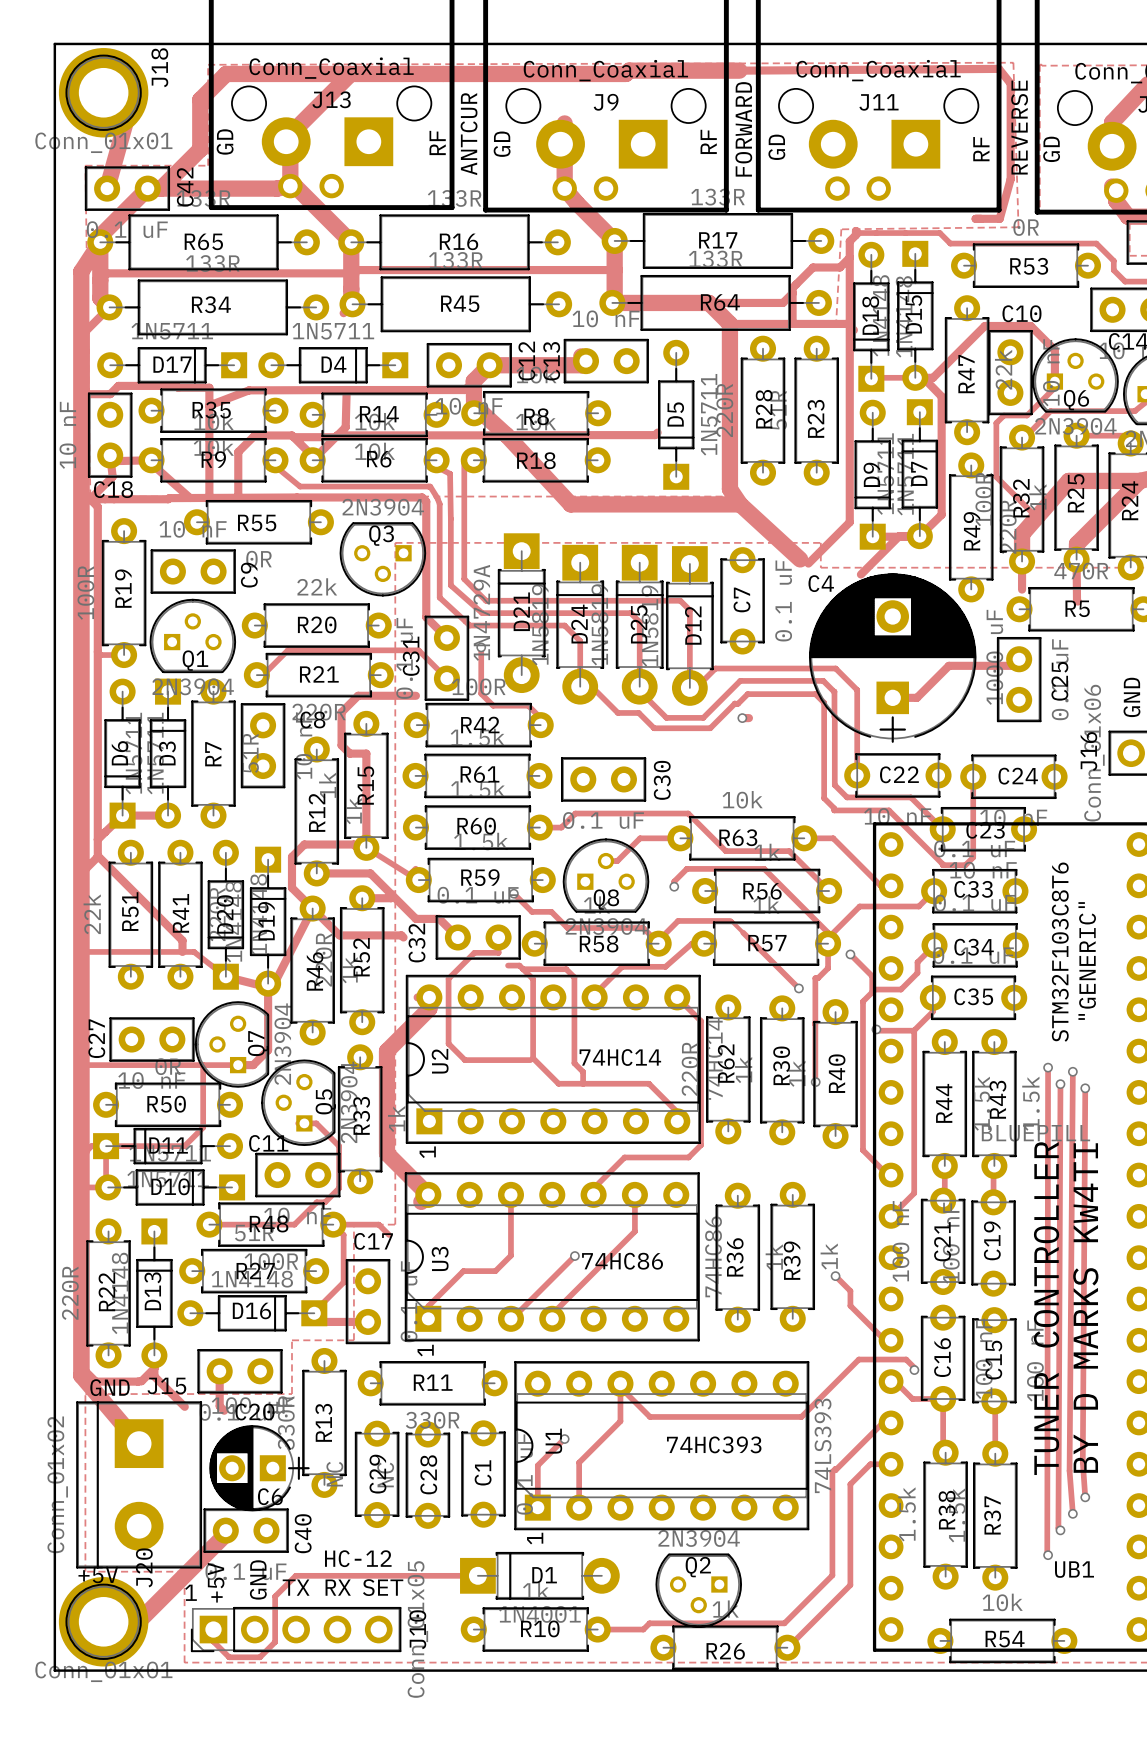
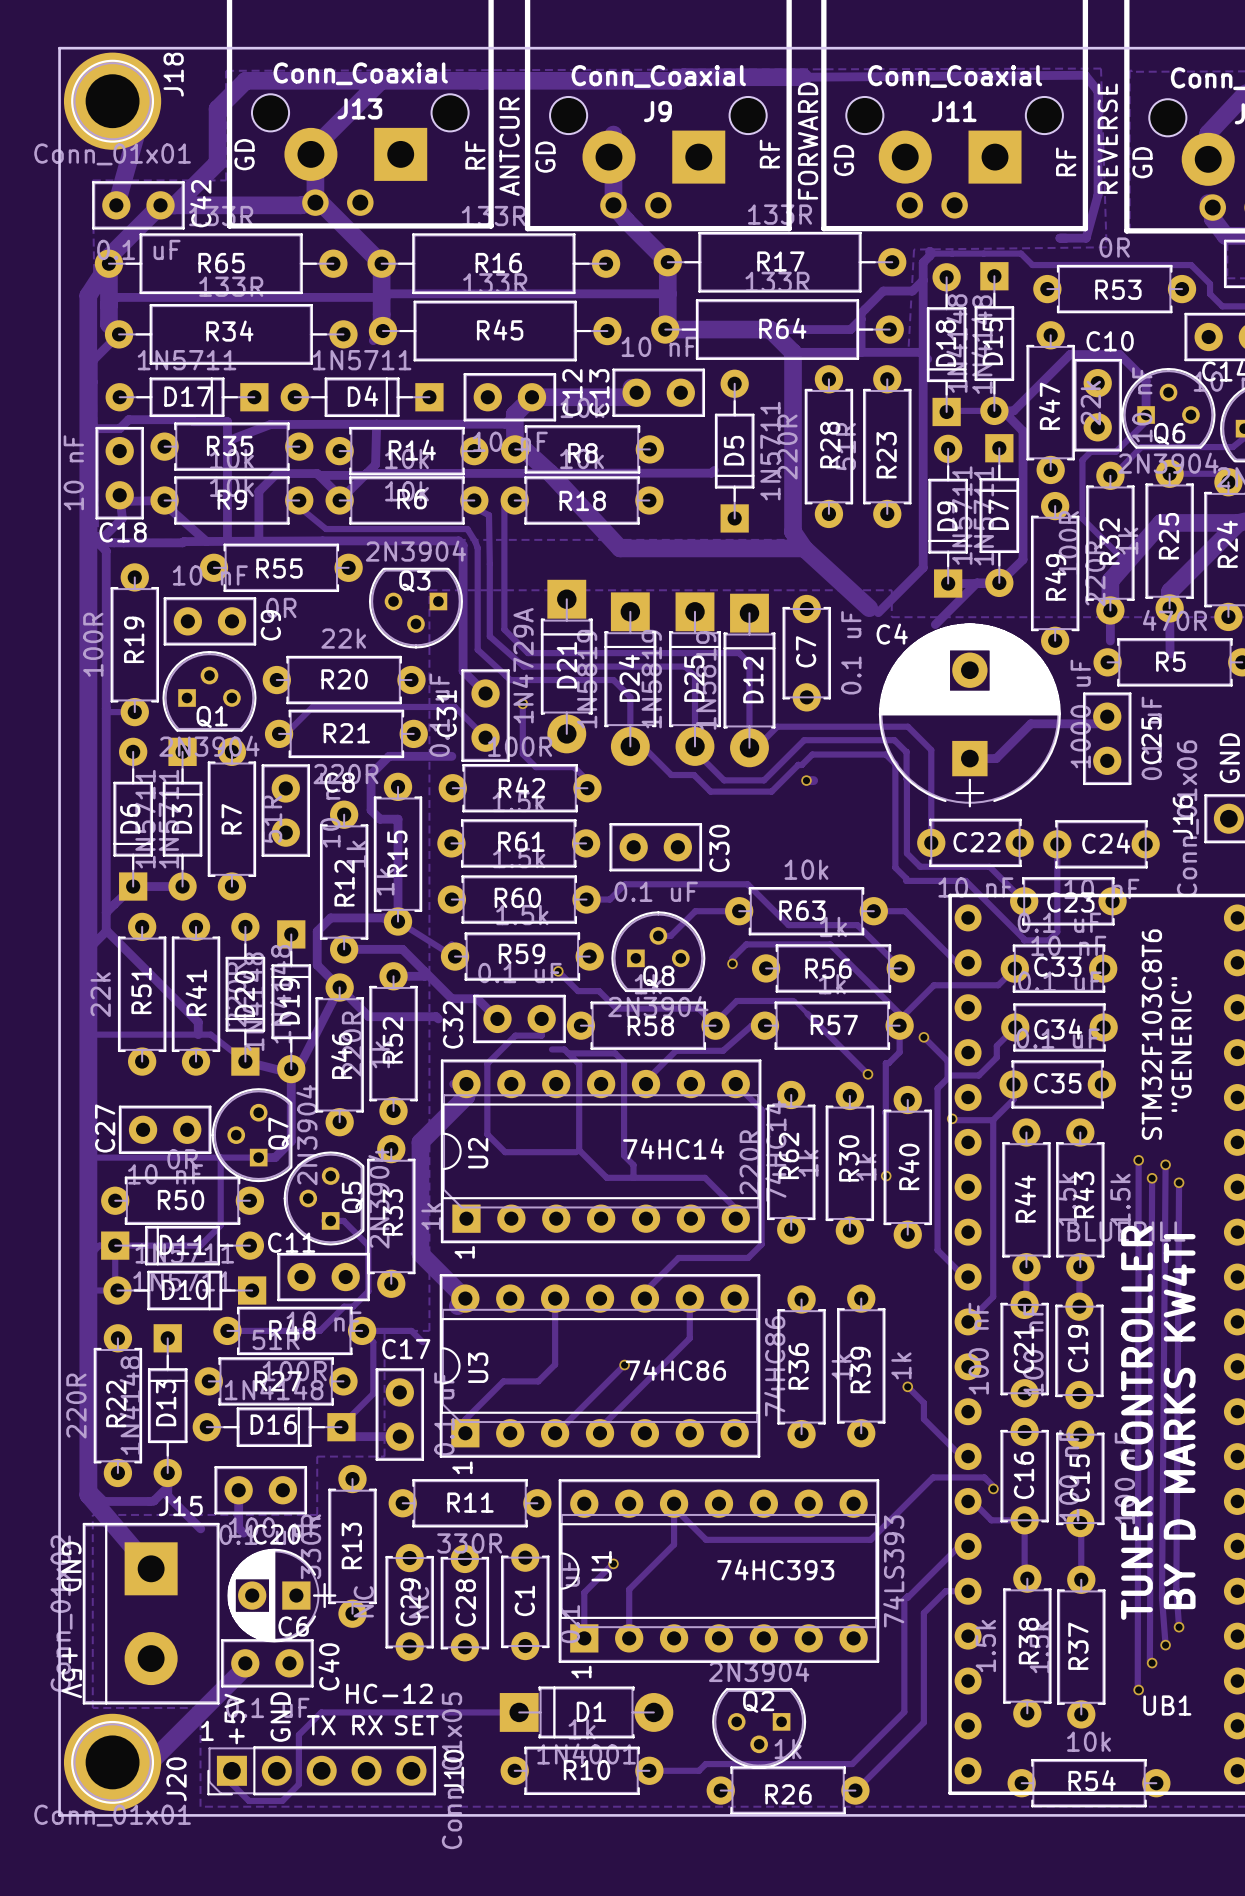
text rotation: 0° (109, 1387) -> 90° clockwise (71, 1566)
text position: GND (109, 1387) -> GND (71, 1566)
J20 name position: J20 (144, 1567) -> J20 (176, 1779)
text rotation: 0° (98, 1574) -> 90° clockwise (71, 1672)

